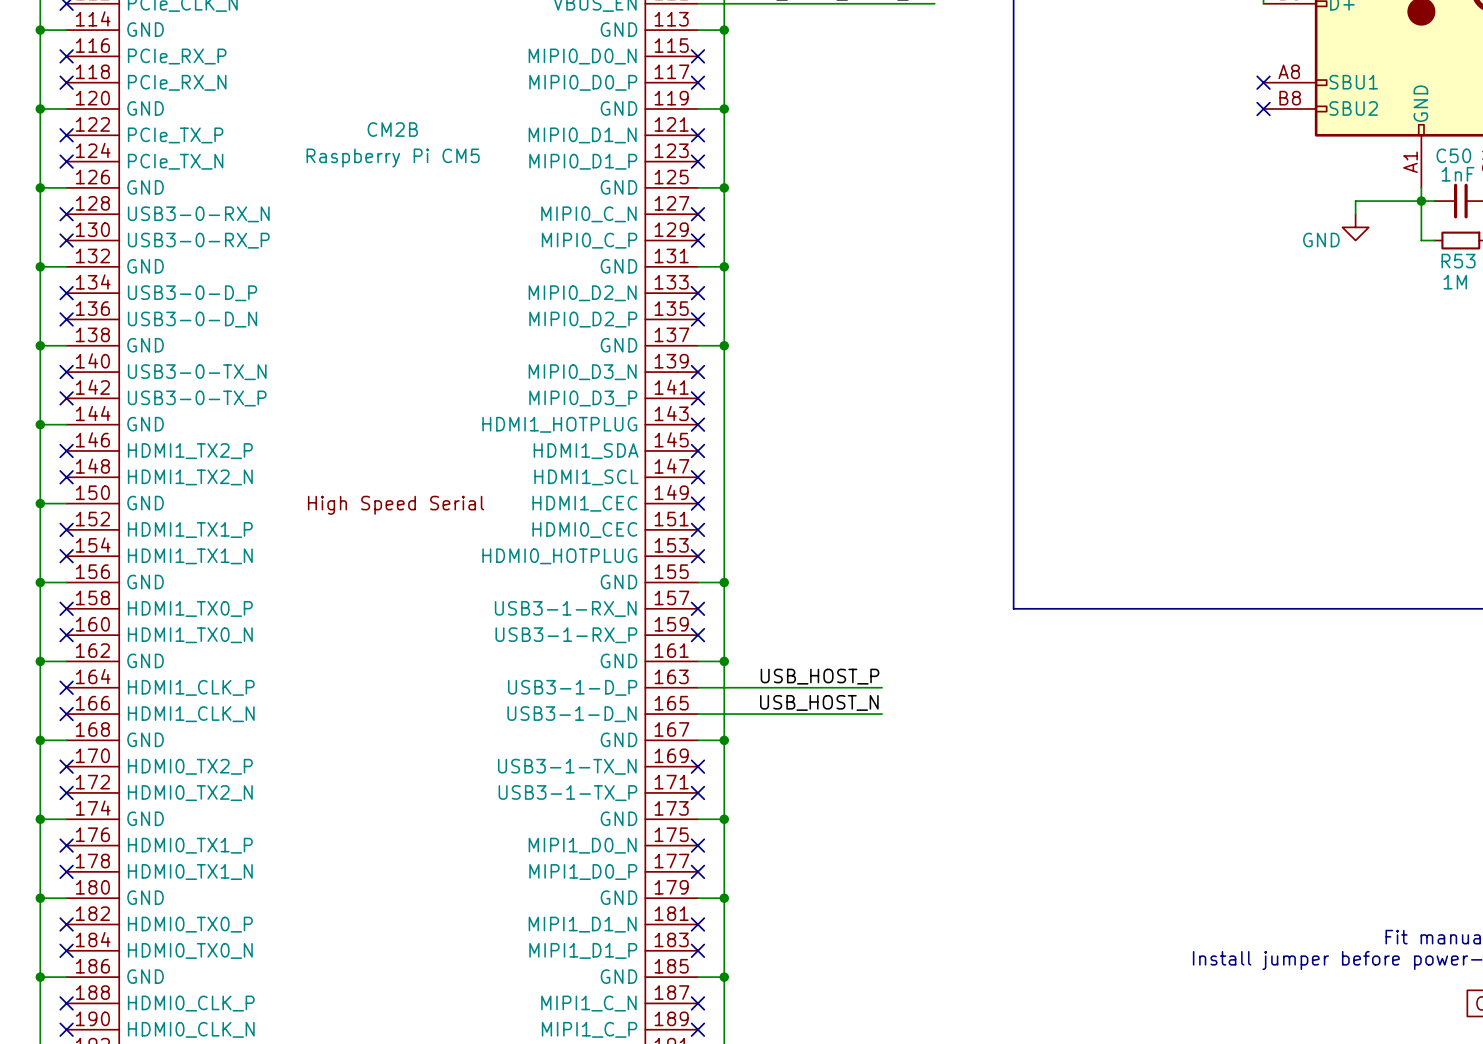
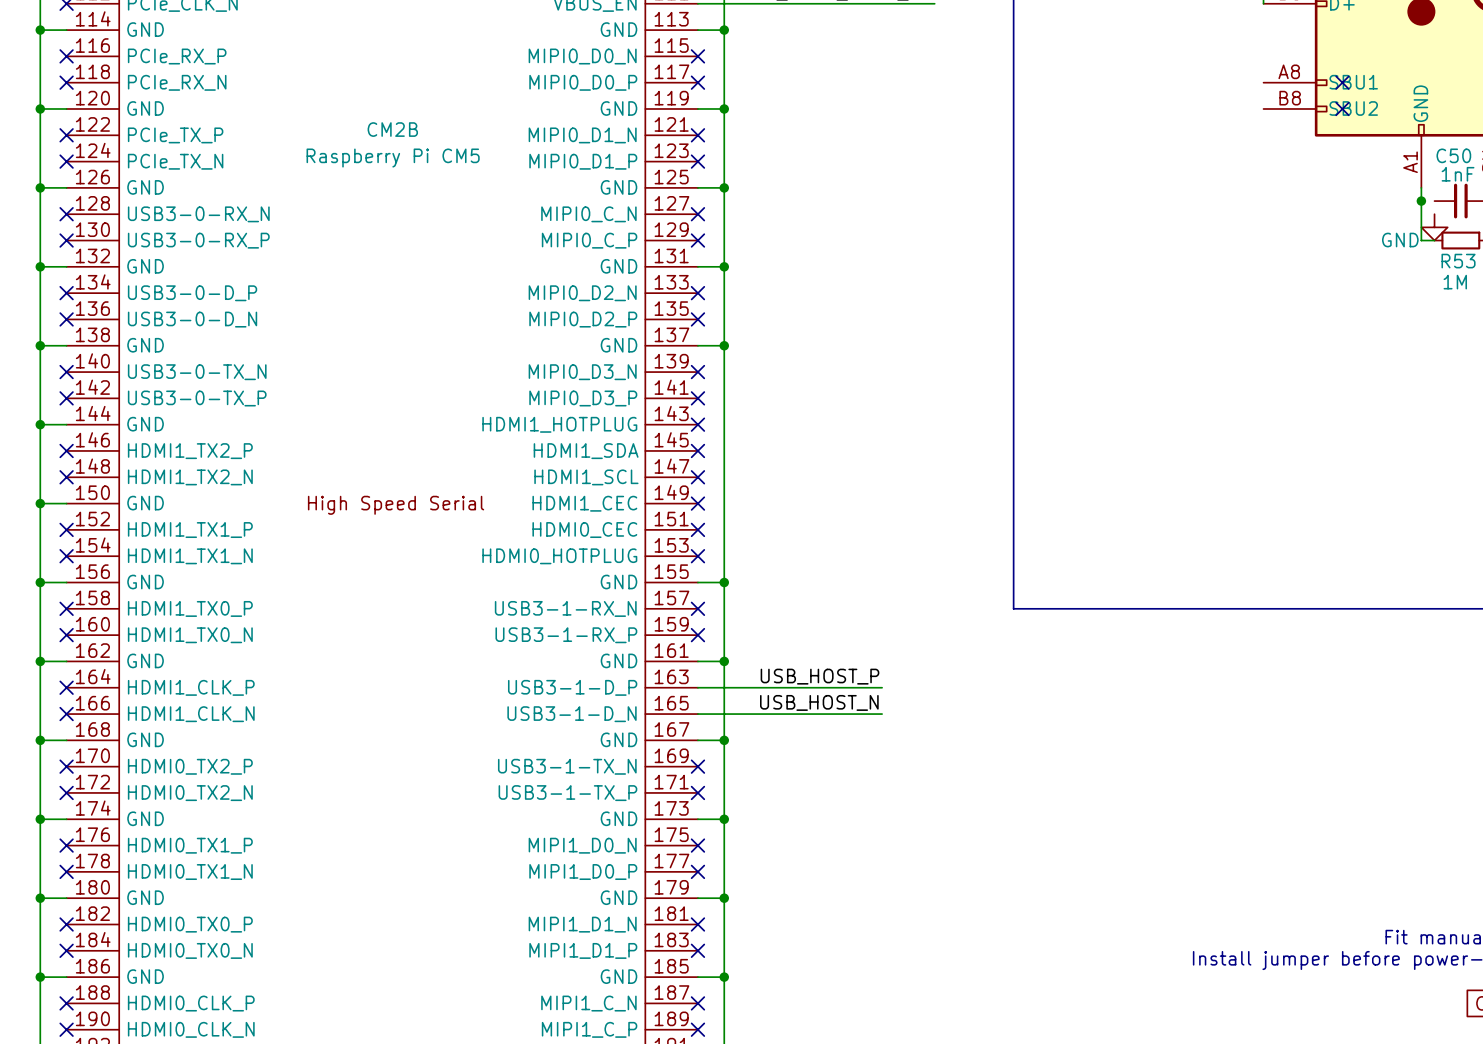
no-connect mark: (1263, 82) -> none
no-connect mark: none -> (1342, 82)
no-connect mark: (1263, 108) -> none
no-connect mark: none -> (1342, 108)
wire: (1434, 201) (1355, 201) (1355, 214) -> none
power symbol position: GND (1355, 227) -> GND (1434, 227)

